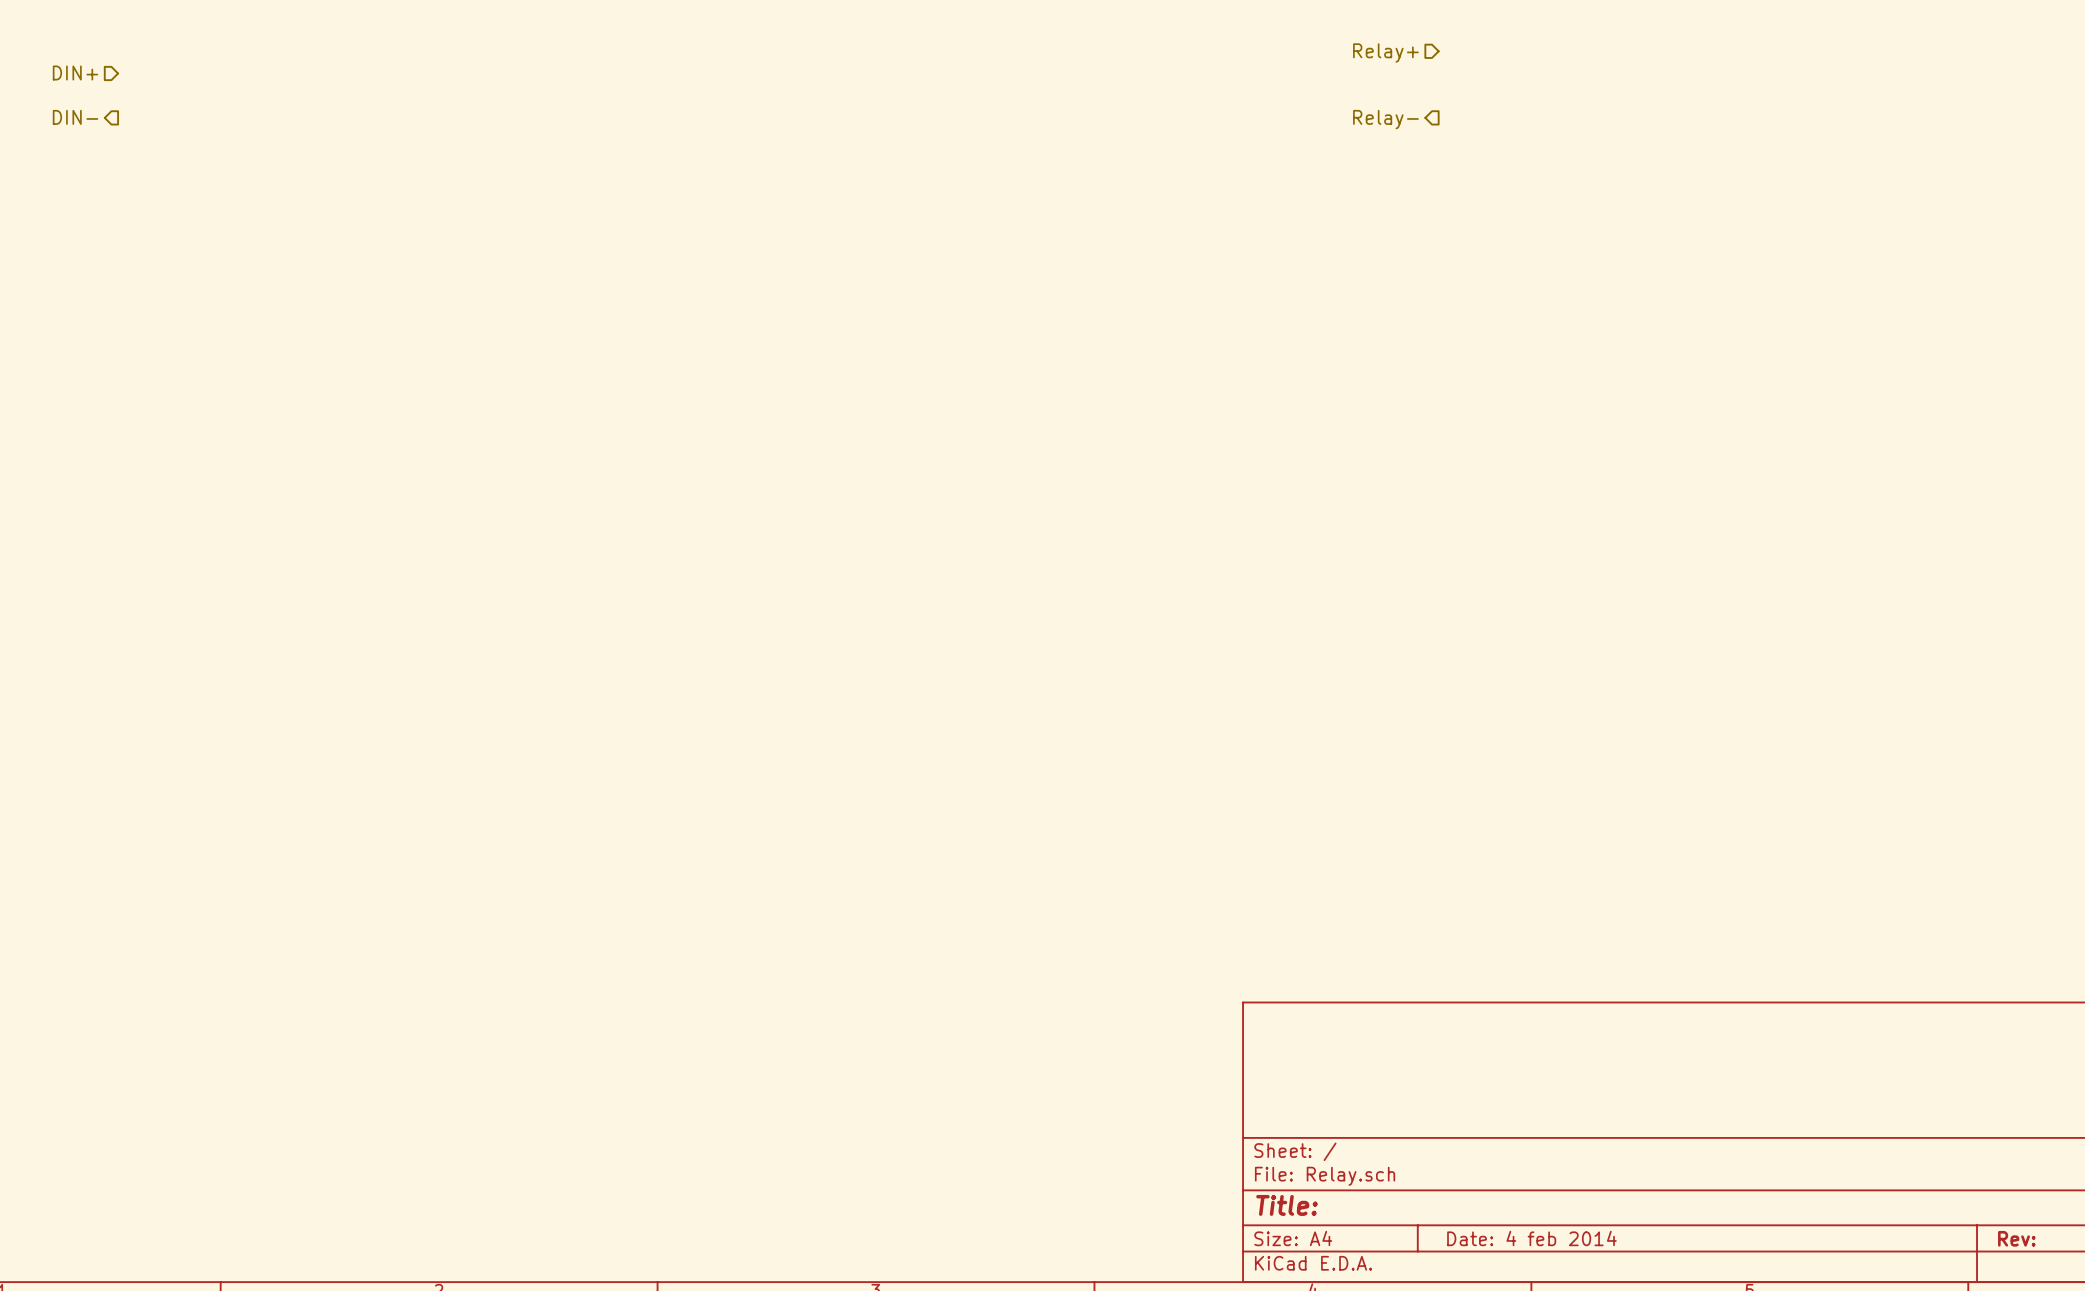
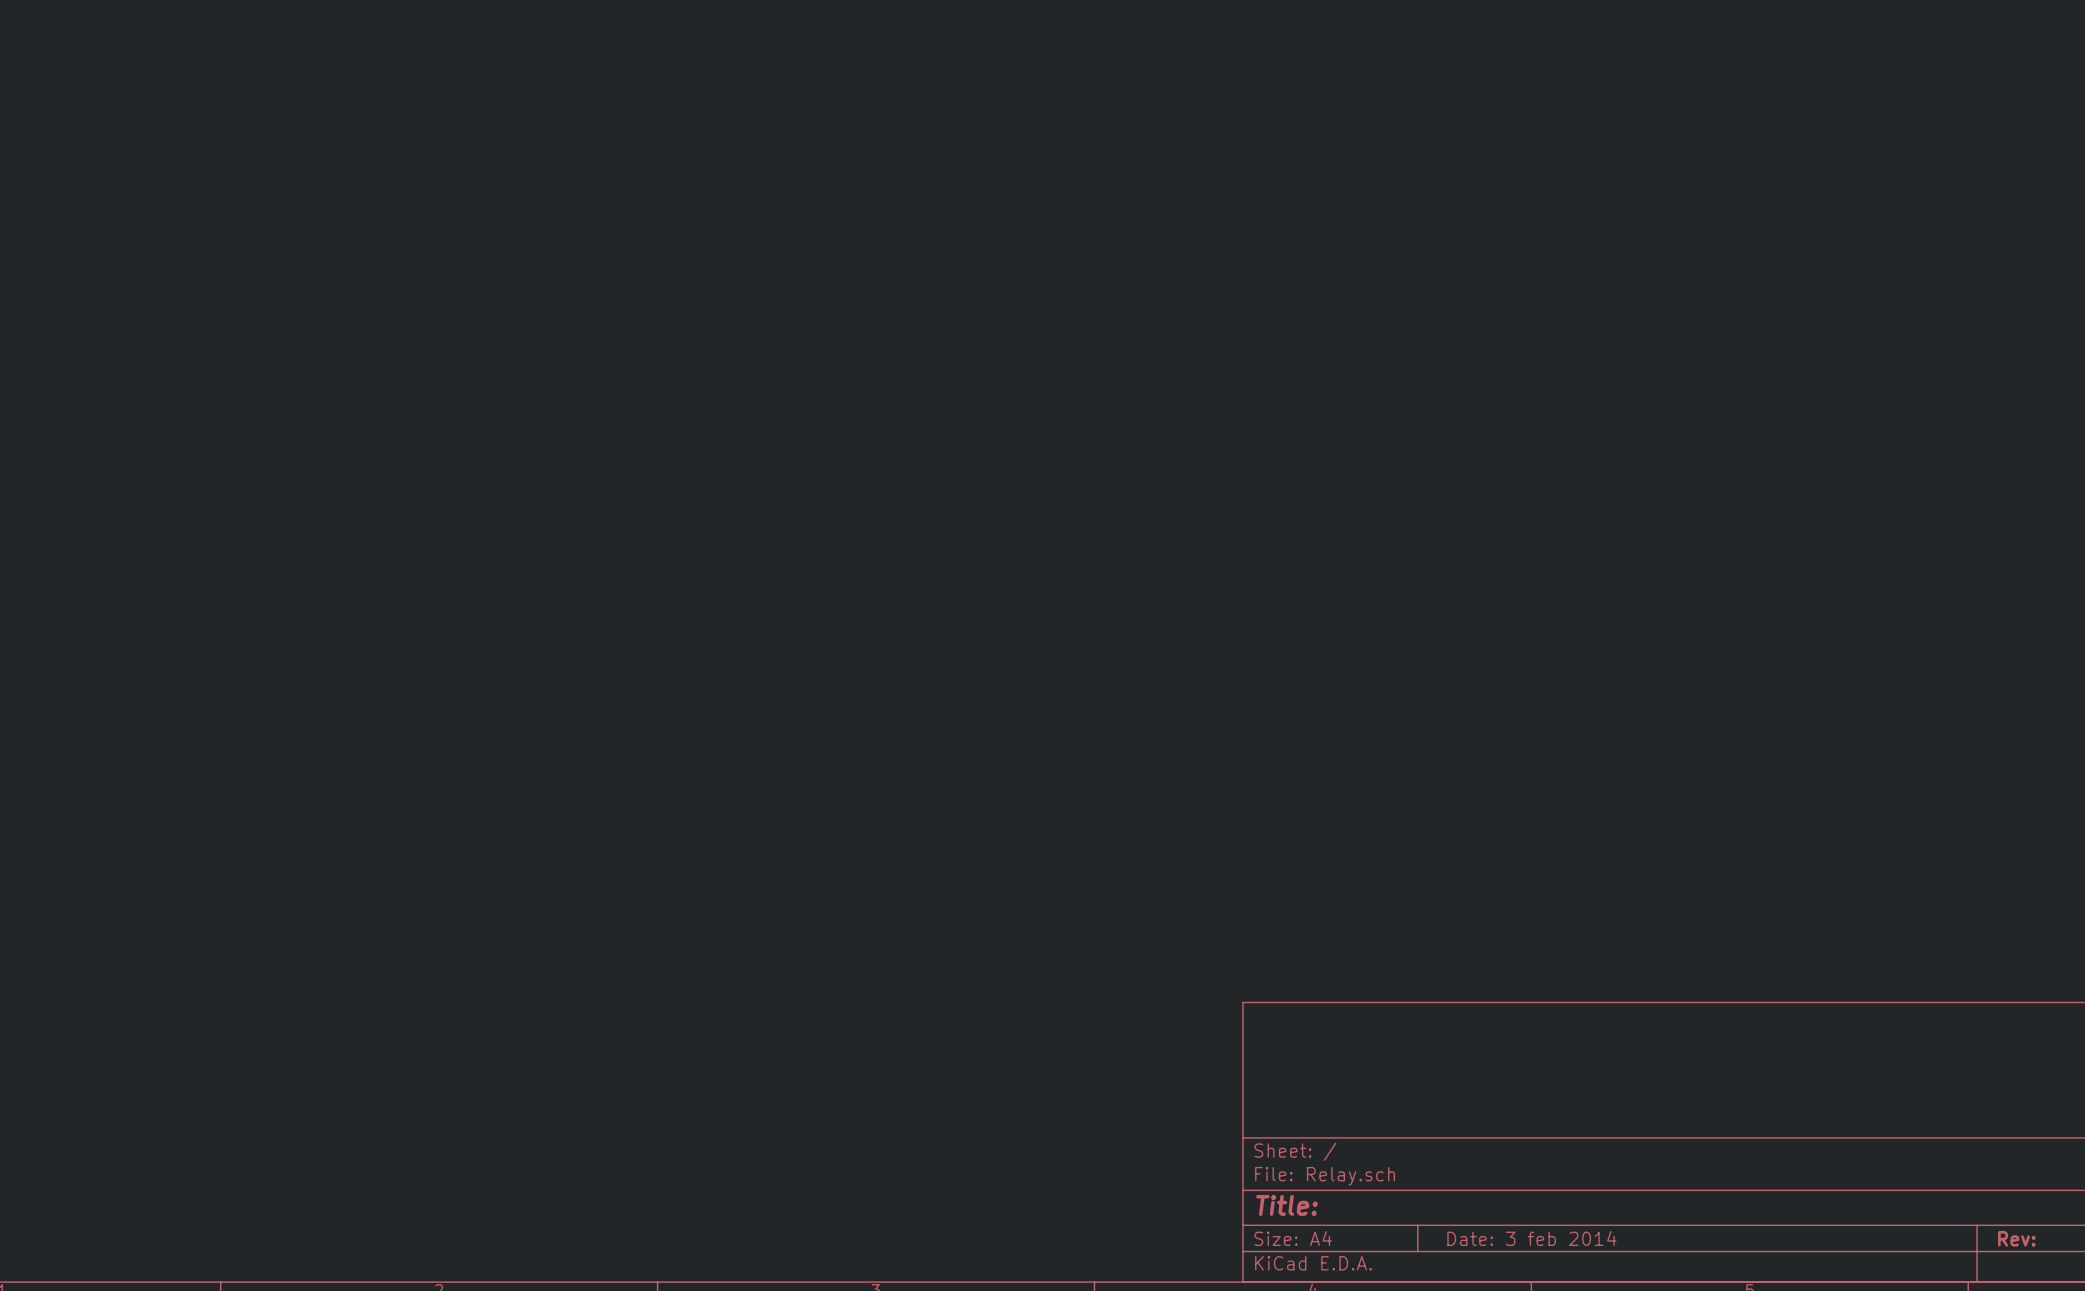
hierarchical label: Relay+ (1385, 53) -> none
hierarchical label: DIN+ (75, 73) -> none
hierarchical label: DIN- (75, 117) -> none
hierarchical label: Relay- (1385, 119) -> none
title block: Date: 4 feb 2014 (1531, 1238) -> Date: 3 feb 2014 (1531, 1238)

